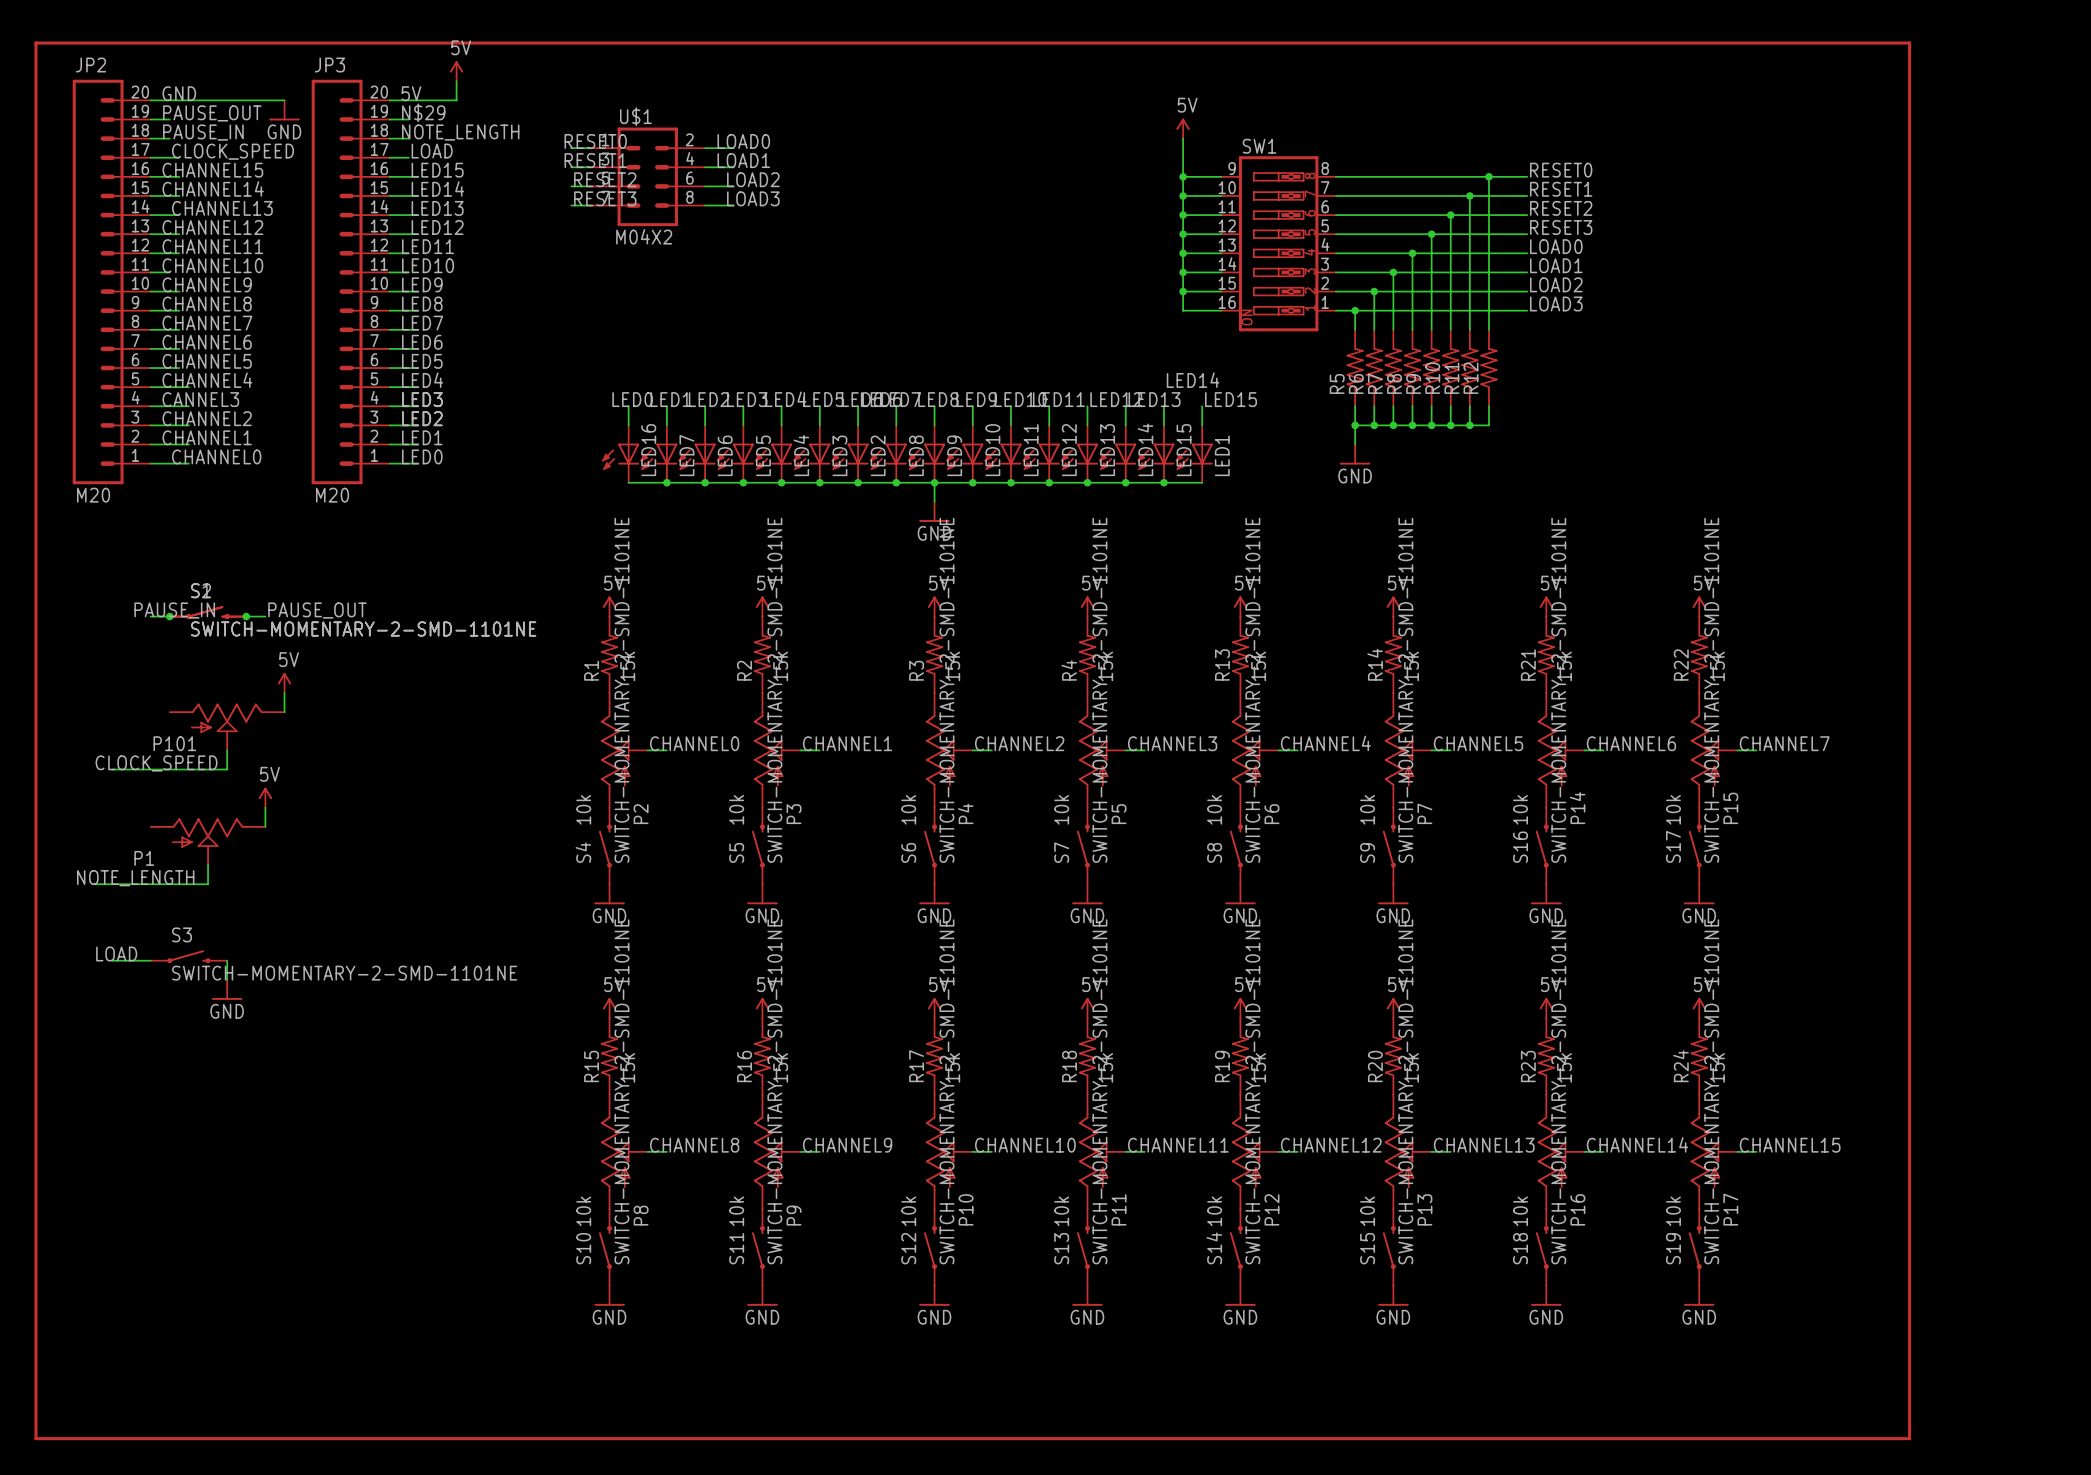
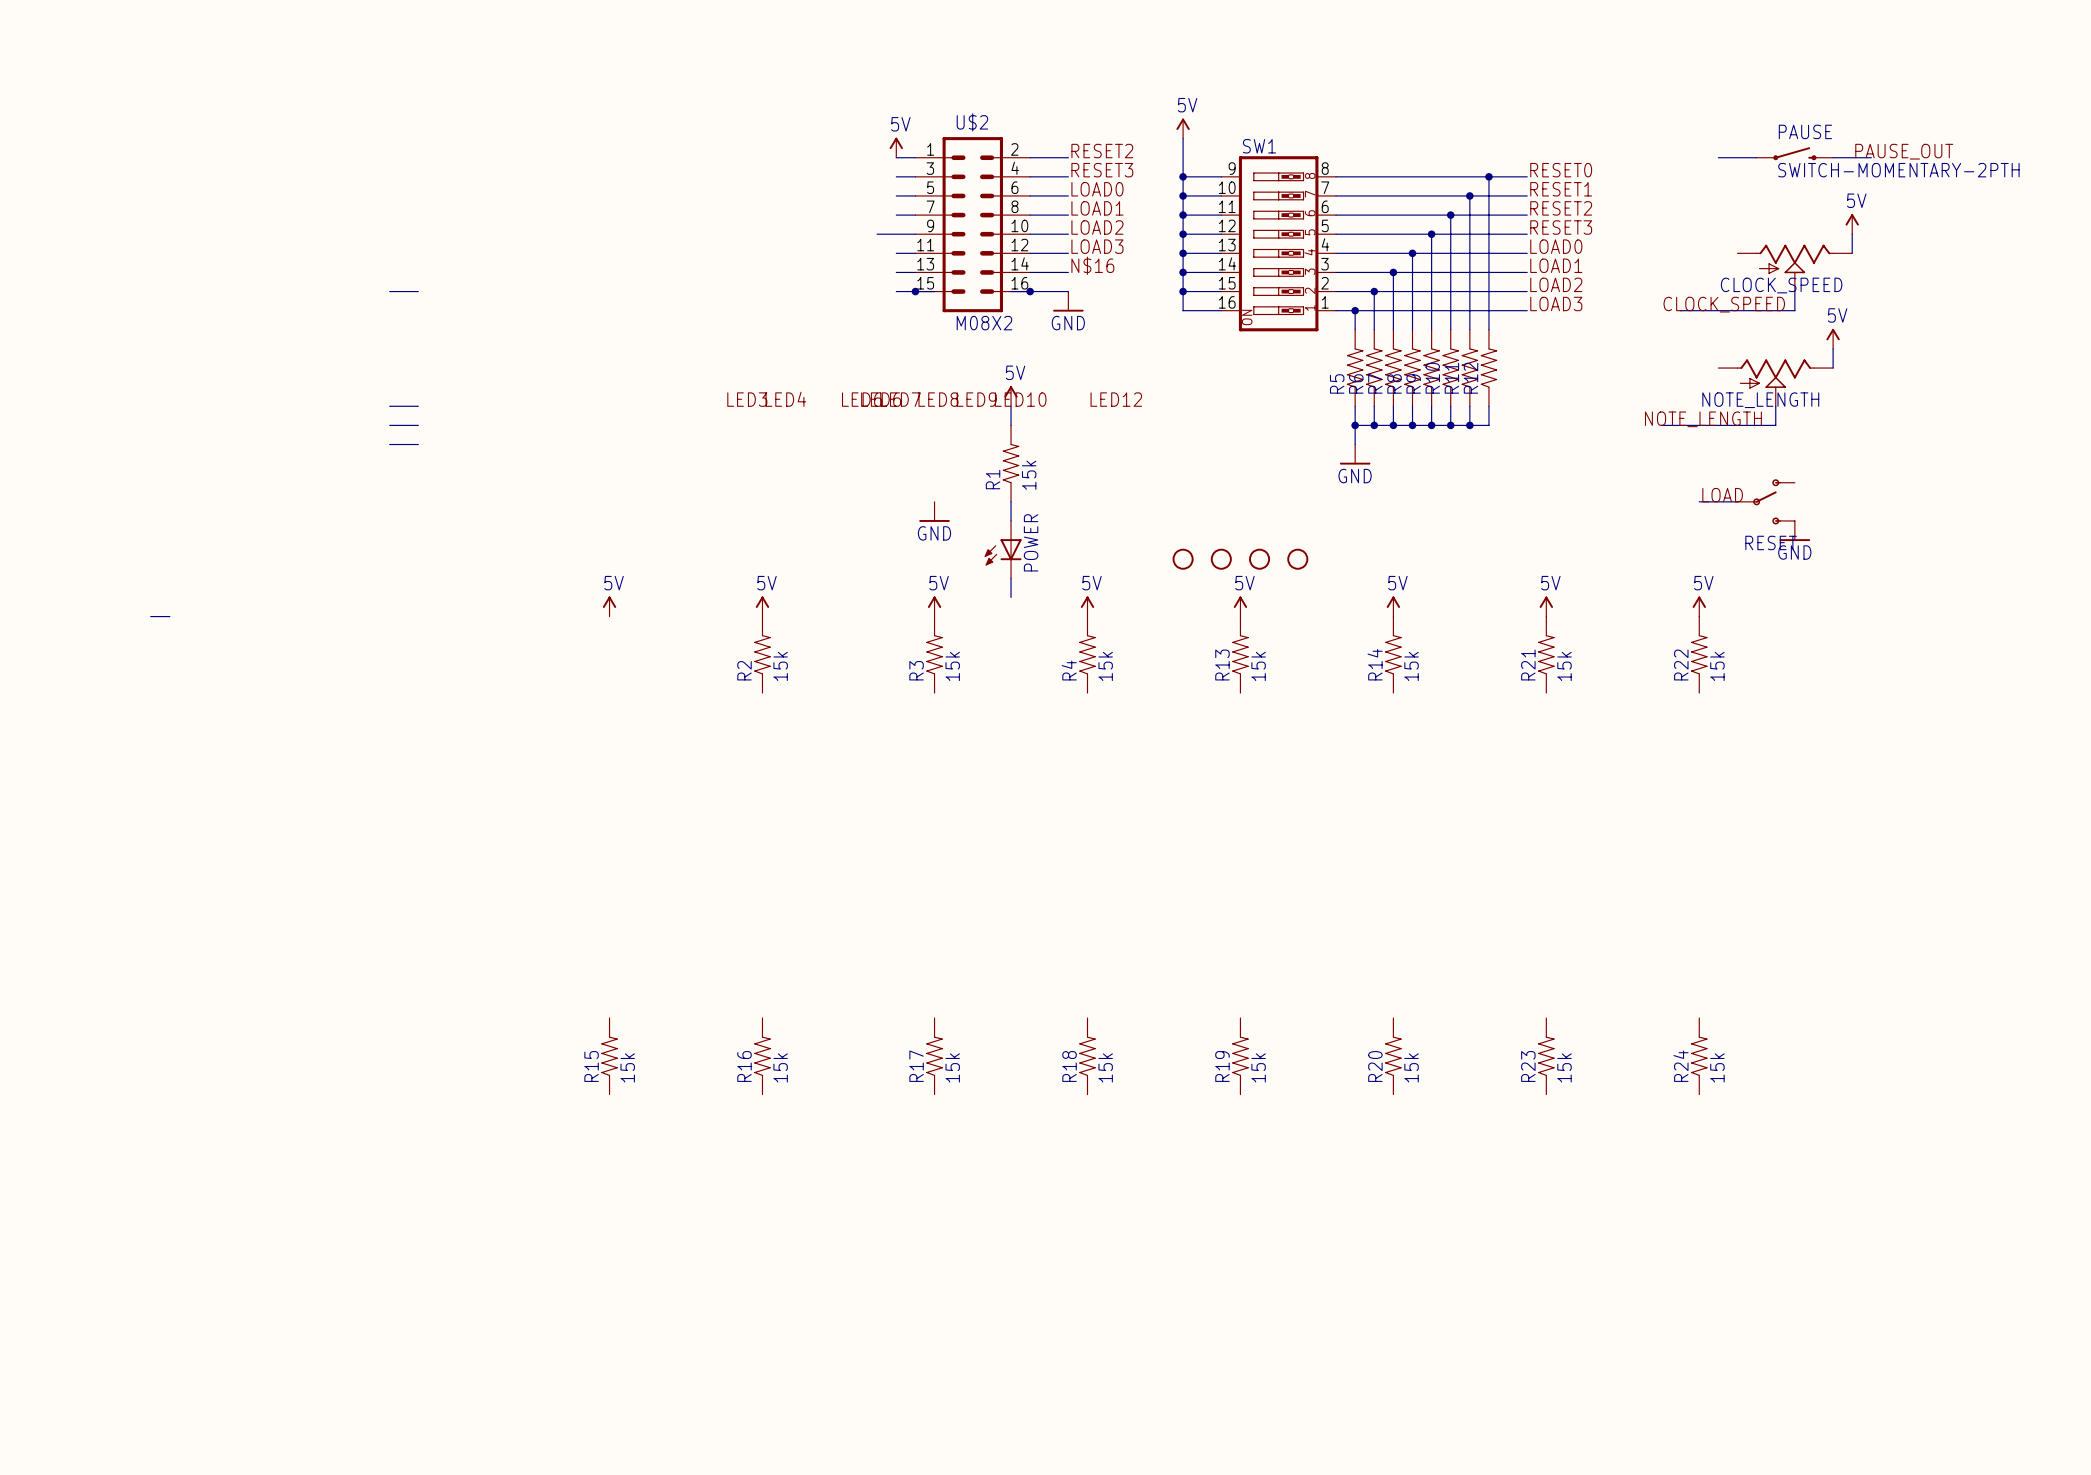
power symbol: 5V (456, 71) -> none
wire: (456, 81) (456, 100) (389, 100) -> none
label: GND (179, 93) -> none
label: 5V (411, 93) -> none
wire: (150, 100) (284, 100) -> none
power symbol: GND (284, 110) -> none
label: N$29 (423, 112) -> none
label: PAUSE_OUT (212, 113) -> none
wire: (150, 119) (169, 119) -> none
wire: (389, 119) (408, 119) -> none
label: PAUSE_IN (203, 132) -> none
label: NOTE_LENGTH (460, 132) -> none
wire: (150, 138) (169, 138) -> none
wire: (389, 138) (408, 138) -> none
label: RESET0 (595, 141) -> none
label: LOAD0 (743, 141) -> none
power symbol: none -> 5V (896, 147)
wire: (571, 148) (590, 148) -> none
wire: (705, 148) (733, 148) -> none
label: CLOCK_SPEED (233, 151) -> none
label: LOAD (432, 151) -> none
label: none -> RESET2 (1102, 151)
label: none -> PAUSE_OUT (1904, 151)
PAUSE: none -> SWITCH-MOMENTARY-2PTH (1794, 153)
wire: (150, 157) (179, 157) -> none
wire: (389, 157) (408, 157) -> none
wire: none -> (896, 157) (915, 157)
wire: none -> (1030, 157) (1068, 157)
wire: none -> (1718, 157) (1756, 157)
wire: none -> (1833, 157) (1871, 157)
label: RESET1 (595, 160) -> none
label: LOAD1 (743, 160) -> none
wire: (571, 167) (590, 167) -> none
wire: (705, 167) (733, 167) -> none
label: CHANNEL15 (212, 170) -> none
label: LED15 (437, 170) -> none
label: none -> RESET3 (1102, 170)
wire: (150, 176) (179, 176) -> none
wire: (389, 176) (418, 176) -> none
U$1: M04X2 (647, 176) -> none
wire: none -> (896, 176) (915, 176)
wire: none -> (1030, 176) (1068, 176)
label: RESET2 (605, 179) -> none
label: LOAD2 (753, 179) -> none
wire: (571, 186) (590, 186) -> none
wire: (705, 186) (733, 186) -> none
label: CHANNEL14 (213, 188) -> none
label: LED14 (437, 188) -> none
label: none -> LOAD0 (1097, 189)
wire: (150, 195) (179, 195) -> none
wire: (389, 195) (418, 195) -> none
wire: none -> (896, 195) (915, 195)
wire: none -> (1030, 195) (1068, 195)
label: RESET3 (605, 198) -> none
label: LOAD3 (753, 198) -> none
wire: (571, 205) (590, 205) -> none
wire: (705, 205) (733, 205) -> none
label: CHANNEL13 (222, 208) -> none
label: LED13 (437, 208) -> none
label: none -> LOAD1 (1097, 208)
wire: (150, 215) (179, 215) -> none
wire: (389, 215) (418, 215) -> none
wire: none -> (896, 215) (915, 215)
wire: none -> (1030, 215) (1068, 215)
U$2: none -> M08X2 (972, 224)
power symbol: none -> 5V (1852, 224)
label: CHANNEL12 (212, 227) -> none
label: LED12 (437, 227) -> none
label: none -> LOAD2 (1097, 227)
wire: (150, 234) (179, 234) -> none
wire: (389, 234) (418, 234) -> none
wire: none -> (877, 234) (915, 234)
wire: none -> (1030, 234) (1068, 234)
wire: none -> (1852, 234) (1852, 253)
label: CHANNEL11 (212, 246) -> none
label: LED11 (428, 246) -> none
label: none -> LOAD3 (1097, 246)
wire: (150, 253) (179, 253) -> none
wire: (389, 253) (408, 253) -> none
wire: none -> (896, 253) (915, 253)
wire: none -> (1030, 253) (1068, 253)
label: CHANNEL10 (212, 265) -> none
label: LED10 (428, 265) -> none
label: none -> N$16 (1092, 265)
CLOCK_SPEED: none -> (1794, 268)
wire: (150, 272) (169, 272) -> none
wire: (389, 272) (408, 272) -> none
wire: none -> (896, 272) (915, 272)
wire: none -> (1030, 272) (1068, 272)
JP2: M20 (111, 282) -> none
JP3: M20 (350, 282) -> none
label: CHANNEL9 (207, 284) -> none
label: LED9 (422, 284) -> none
wire: (150, 291) (179, 291) -> none
wire: none -> (896, 291) (934, 291)
junction: none -> (915, 291)
wire: none -> (1011, 291) (1068, 291)
junction: none -> (1030, 291)
wire: none -> (1794, 291) (1794, 310) (1680, 310)
power symbol: none -> GND (1068, 301)
label: CHANNEL8 (207, 303) -> none
label: LED8 (422, 303) -> none
label: none -> CLOCK_SPEED (1724, 304)
wire: (150, 310) (179, 310) -> none
wire: (389, 310) (418, 310) -> none
label: CHANNEL7 (207, 323) -> none
label: LED7 (422, 323) -> none
wire: (150, 329) (179, 329) -> none
wire: (389, 329) (418, 329) -> none
power symbol: none -> 5V (1833, 338)
label: CHANNEL6 (207, 342) -> none
label: LED6 (422, 342) -> none
wire: (150, 348) (179, 348) -> none
wire: (389, 348) (418, 348) -> none
wire: none -> (1833, 348) (1833, 368)
label: CHANNEL5 (207, 361) -> none
label: LED5 (422, 361) -> none
wire: (150, 368) (179, 368) -> none
wire: (389, 368) (418, 368) -> none
label: CHANNEL4 (207, 380) -> none
label: LED4 (422, 380) -> none
label: LED14 (1193, 380) -> none
NOTE_LENGTH: none -> (1775, 382)
wire: (150, 387) (188, 387) -> none
wire: (389, 387) (418, 387) -> none
power symbol: none -> 5V (1011, 396)
label: CANNEL3 (200, 399) -> none
label: LED3 (422, 399) -> none
label: LED0 (632, 399) -> none
label: LED1 (670, 399) -> none
label: LED2 (709, 399) -> none
label: LED5 (823, 399) -> none
label: LED11 (1058, 399) -> none
label: LED13 (1154, 399) -> none
label: LED15 (1231, 399) -> none
wire: (150, 406) (188, 406) -> none
wire: (628, 406) (628, 425) -> none
wire: (666, 406) (666, 425) -> none
wire: (705, 406) (705, 425) -> none
wire: (743, 406) (743, 425) -> none
wire: (781, 406) (781, 425) -> none
wire: (819, 406) (819, 425) -> none
wire: (858, 406) (858, 425) -> none
wire: (896, 406) (896, 425) -> none
wire: (934, 406) (934, 425) -> (1011, 501) (1011, 520)
wire: (972, 406) (972, 425) -> none
wire: (1049, 406) (1049, 425) -> none
wire: (1087, 406) (1087, 425) -> none
wire: (1125, 406) (1125, 425) -> none
wire: (1163, 406) (1163, 425) -> none
wire: (1202, 406) (1202, 425) -> none
wire: none -> (1775, 406) (1775, 425) (1661, 425)
label: CHANNEL2 (207, 418) -> none
label: LED2 (422, 418) -> none
label: none -> NOTE_LENGTH (1703, 419)
wire: (150, 425) (188, 425) -> none
label: CHANNEL1 (207, 437) -> none
label: LED1 (422, 437) -> none
wire: (150, 444) (188, 444) -> none
LED16: (620, 454) -> none
LED7: (658, 454) -> none
LED6: (697, 454) -> none
LED5: (735, 454) -> none
LED4: (773, 454) -> none
LED3: (811, 454) -> none
LED2: (850, 454) -> none
LED8: (888, 454) -> none
LED9: (926, 454) -> none
LED10: (964, 454) -> none
LED11: (1003, 454) -> none
LED12: (1041, 454) -> none
LED13: (1079, 454) -> none
LED14: (1117, 454) -> none
LED15: (1156, 454) -> none
LED1: (1194, 454) -> none
label: CHANNEL0 (216, 456) -> none
label: LED0 (422, 456) -> none
wire: (150, 463) (188, 463) -> none
wire: (389, 463) (418, 463) -> none
wire: (628, 482) (1202, 482) -> none
junction: (666, 482) -> none
junction: (705, 482) -> none
junction: (743, 482) -> none
junction: (781, 482) -> none
junction: (819, 482) -> none
junction: (858, 482) -> none
junction: (896, 482) -> none
wire: (934, 482) (934, 501) -> (1011, 578) (1011, 597)
junction: (934, 482) -> none
junction: (972, 482) -> none
junction: (1011, 482) -> none
junction: (1049, 482) -> none
junction: (1087, 482) -> none
junction: (1125, 482) -> none
junction: (1163, 482) -> none
label: none -> LOAD (1722, 495)
wire: none -> (1699, 501) (1737, 501)
RESET: none -> (1766, 501)
power symbol: none -> GND (1794, 531)
POWER: none -> (1003, 549)
part: none -> (1183, 559)
part: none -> (1221, 559)
part: none -> (1259, 559)
part: none -> (1297, 559)
label: PAUSE_IN (174, 610) -> none
label: PAUSE_OUT (317, 610) -> none
part: SWITCH-MOMENTARY-2-SMD-1101NE (208, 612) -> none
part: SWITCH-MOMENTARY-2-SMD-1101NE (208, 612) -> none
junction: (169, 616) -> none
wire: (246, 616) (265, 616) -> none
junction: (246, 616) -> none
R1 position: (609, 654) -> (1011, 463)
power symbol: 5V (284, 683) -> none
wire: (284, 693) (284, 712) -> none
P101: (227, 726) -> none
part: (972, 740) -> none
label: CHANNEL0 (694, 743) -> none
label: CHANNEL1 (847, 743) -> none
label: CHANNEL2 (1019, 743) -> none
label: CHANNEL3 (1172, 743) -> none
label: CHANNEL4 (1325, 743) -> none
label: CHANNEL5 (1478, 743) -> none
label: CHANNEL6 (1631, 743) -> none
label: CHANNEL7 (1784, 743) -> none
wire: (227, 750) (227, 769) (112, 769) -> none
P2: 10k (624, 750) -> none
wire: (647, 750) (666, 750) -> none
P3: 10k (777, 750) -> none
wire: (800, 750) (819, 750) -> none
P4: 10k (949, 750) -> none
wire: (972, 750) (991, 750) -> none
P5: 10k (1102, 750) -> none
wire: (1125, 750) (1144, 750) -> none
P6: 10k (1255, 750) -> none
wire: (1278, 750) (1297, 750) -> none
P7: 10k (1408, 750) -> none
wire: (1431, 750) (1450, 750) -> none
P14: 10k (1561, 750) -> none
wire: (1584, 750) (1603, 750) -> none
P15: 10k (1714, 750) -> none
wire: (1737, 750) (1756, 750) -> none
label: CLOCK_SPEED (156, 763) -> none
power symbol: 5V (265, 797) -> none
wire: (265, 807) (265, 826) -> none
P1: (208, 841) -> none
S4: SWITCH-MOMENTARY-2-SMD-1101NE (605, 845) -> none
S5: SWITCH-MOMENTARY-2-SMD-1101NE (758, 845) -> none
S6: SWITCH-MOMENTARY-2-SMD-1101NE (930, 845) -> none
S7: SWITCH-MOMENTARY-2-SMD-1101NE (1083, 845) -> none
S8: SWITCH-MOMENTARY-2-SMD-1101NE (1236, 845) -> none
S9: SWITCH-MOMENTARY-2-SMD-1101NE (1389, 845) -> none
S16: SWITCH-MOMENTARY-2-SMD-1101NE (1542, 845) -> none
S17: SWITCH-MOMENTARY-2-SMD-1101NE (1695, 845) -> none
wire: (208, 865) (208, 884) (93, 884) -> none
label: NOTE_LENGTH (135, 878) -> none
power symbol: GND (609, 894) -> none
power symbol: GND (762, 894) -> none
power symbol: GND (934, 894) -> none
power symbol: GND (1087, 894) -> none
power symbol: GND (1240, 894) -> none
power symbol: GND (1393, 894) -> none
power symbol: GND (1546, 894) -> none
power symbol: GND (1699, 894) -> none
label: LOAD (116, 954) -> none
S3: SWITCH-MOMENTARY-2-SMD-1101NE (188, 956) -> none
wire: (112, 960) (150, 960) -> none
wire: (227, 960) (227, 979) -> none
power symbol: GND (227, 989) -> none
power symbol: 5V (609, 1008) -> none
power symbol: 5V (762, 1008) -> none
power symbol: 5V (934, 1008) -> none
power symbol: 5V (1087, 1008) -> none
power symbol: 5V (1240, 1008) -> none
power symbol: 5V (1393, 1008) -> none
power symbol: 5V (1546, 1008) -> none
power symbol: 5V (1699, 1008) -> none
label: CHANNEL14 (1637, 1144) -> none
label: CHANNEL8 (694, 1145) -> none
label: CHANNEL9 (847, 1145) -> none
label: CHANNEL10 (1025, 1145) -> none
label: CHANNEL11 (1178, 1145) -> none
label: CHANNEL12 (1331, 1145) -> none
label: CHANNEL13 (1484, 1145) -> none
label: CHANNEL15 (1790, 1145) -> none
P8: 10k (624, 1151) -> none
wire: (647, 1151) (666, 1151) -> none
P9: 10k (777, 1151) -> none
wire: (800, 1151) (819, 1151) -> none
P10: 10k (949, 1151) -> none
wire: (972, 1151) (991, 1151) -> none
P11: 10k (1102, 1151) -> none
wire: (1125, 1151) (1144, 1151) -> none
P12: 10k (1255, 1151) -> none
wire: (1278, 1151) (1297, 1151) -> none
P13: 10k (1408, 1151) -> none
wire: (1431, 1151) (1450, 1151) -> none
P16: 10k (1561, 1151) -> none
wire: (1584, 1151) (1603, 1151) -> none
P17: 10k (1714, 1151) -> none
wire: (1737, 1151) (1756, 1151) -> none
S10: SWITCH-MOMENTARY-2-SMD-1101NE (605, 1247) -> none
S11: SWITCH-MOMENTARY-2-SMD-1101NE (758, 1247) -> none
S12: SWITCH-MOMENTARY-2-SMD-1101NE (930, 1247) -> none
S13: SWITCH-MOMENTARY-2-SMD-1101NE (1083, 1247) -> none
S14: SWITCH-MOMENTARY-2-SMD-1101NE (1236, 1247) -> none
S15: SWITCH-MOMENTARY-2-SMD-1101NE (1389, 1247) -> none
S18: SWITCH-MOMENTARY-2-SMD-1101NE (1542, 1247) -> none
S19: SWITCH-MOMENTARY-2-SMD-1101NE (1695, 1247) -> none
power symbol: GND (609, 1295) -> none
power symbol: GND (762, 1295) -> none
power symbol: GND (934, 1295) -> none
power symbol: GND (1087, 1295) -> none
power symbol: GND (1240, 1295) -> none
power symbol: GND (1393, 1295) -> none
power symbol: GND (1546, 1295) -> none
power symbol: GND (1699, 1295) -> none

